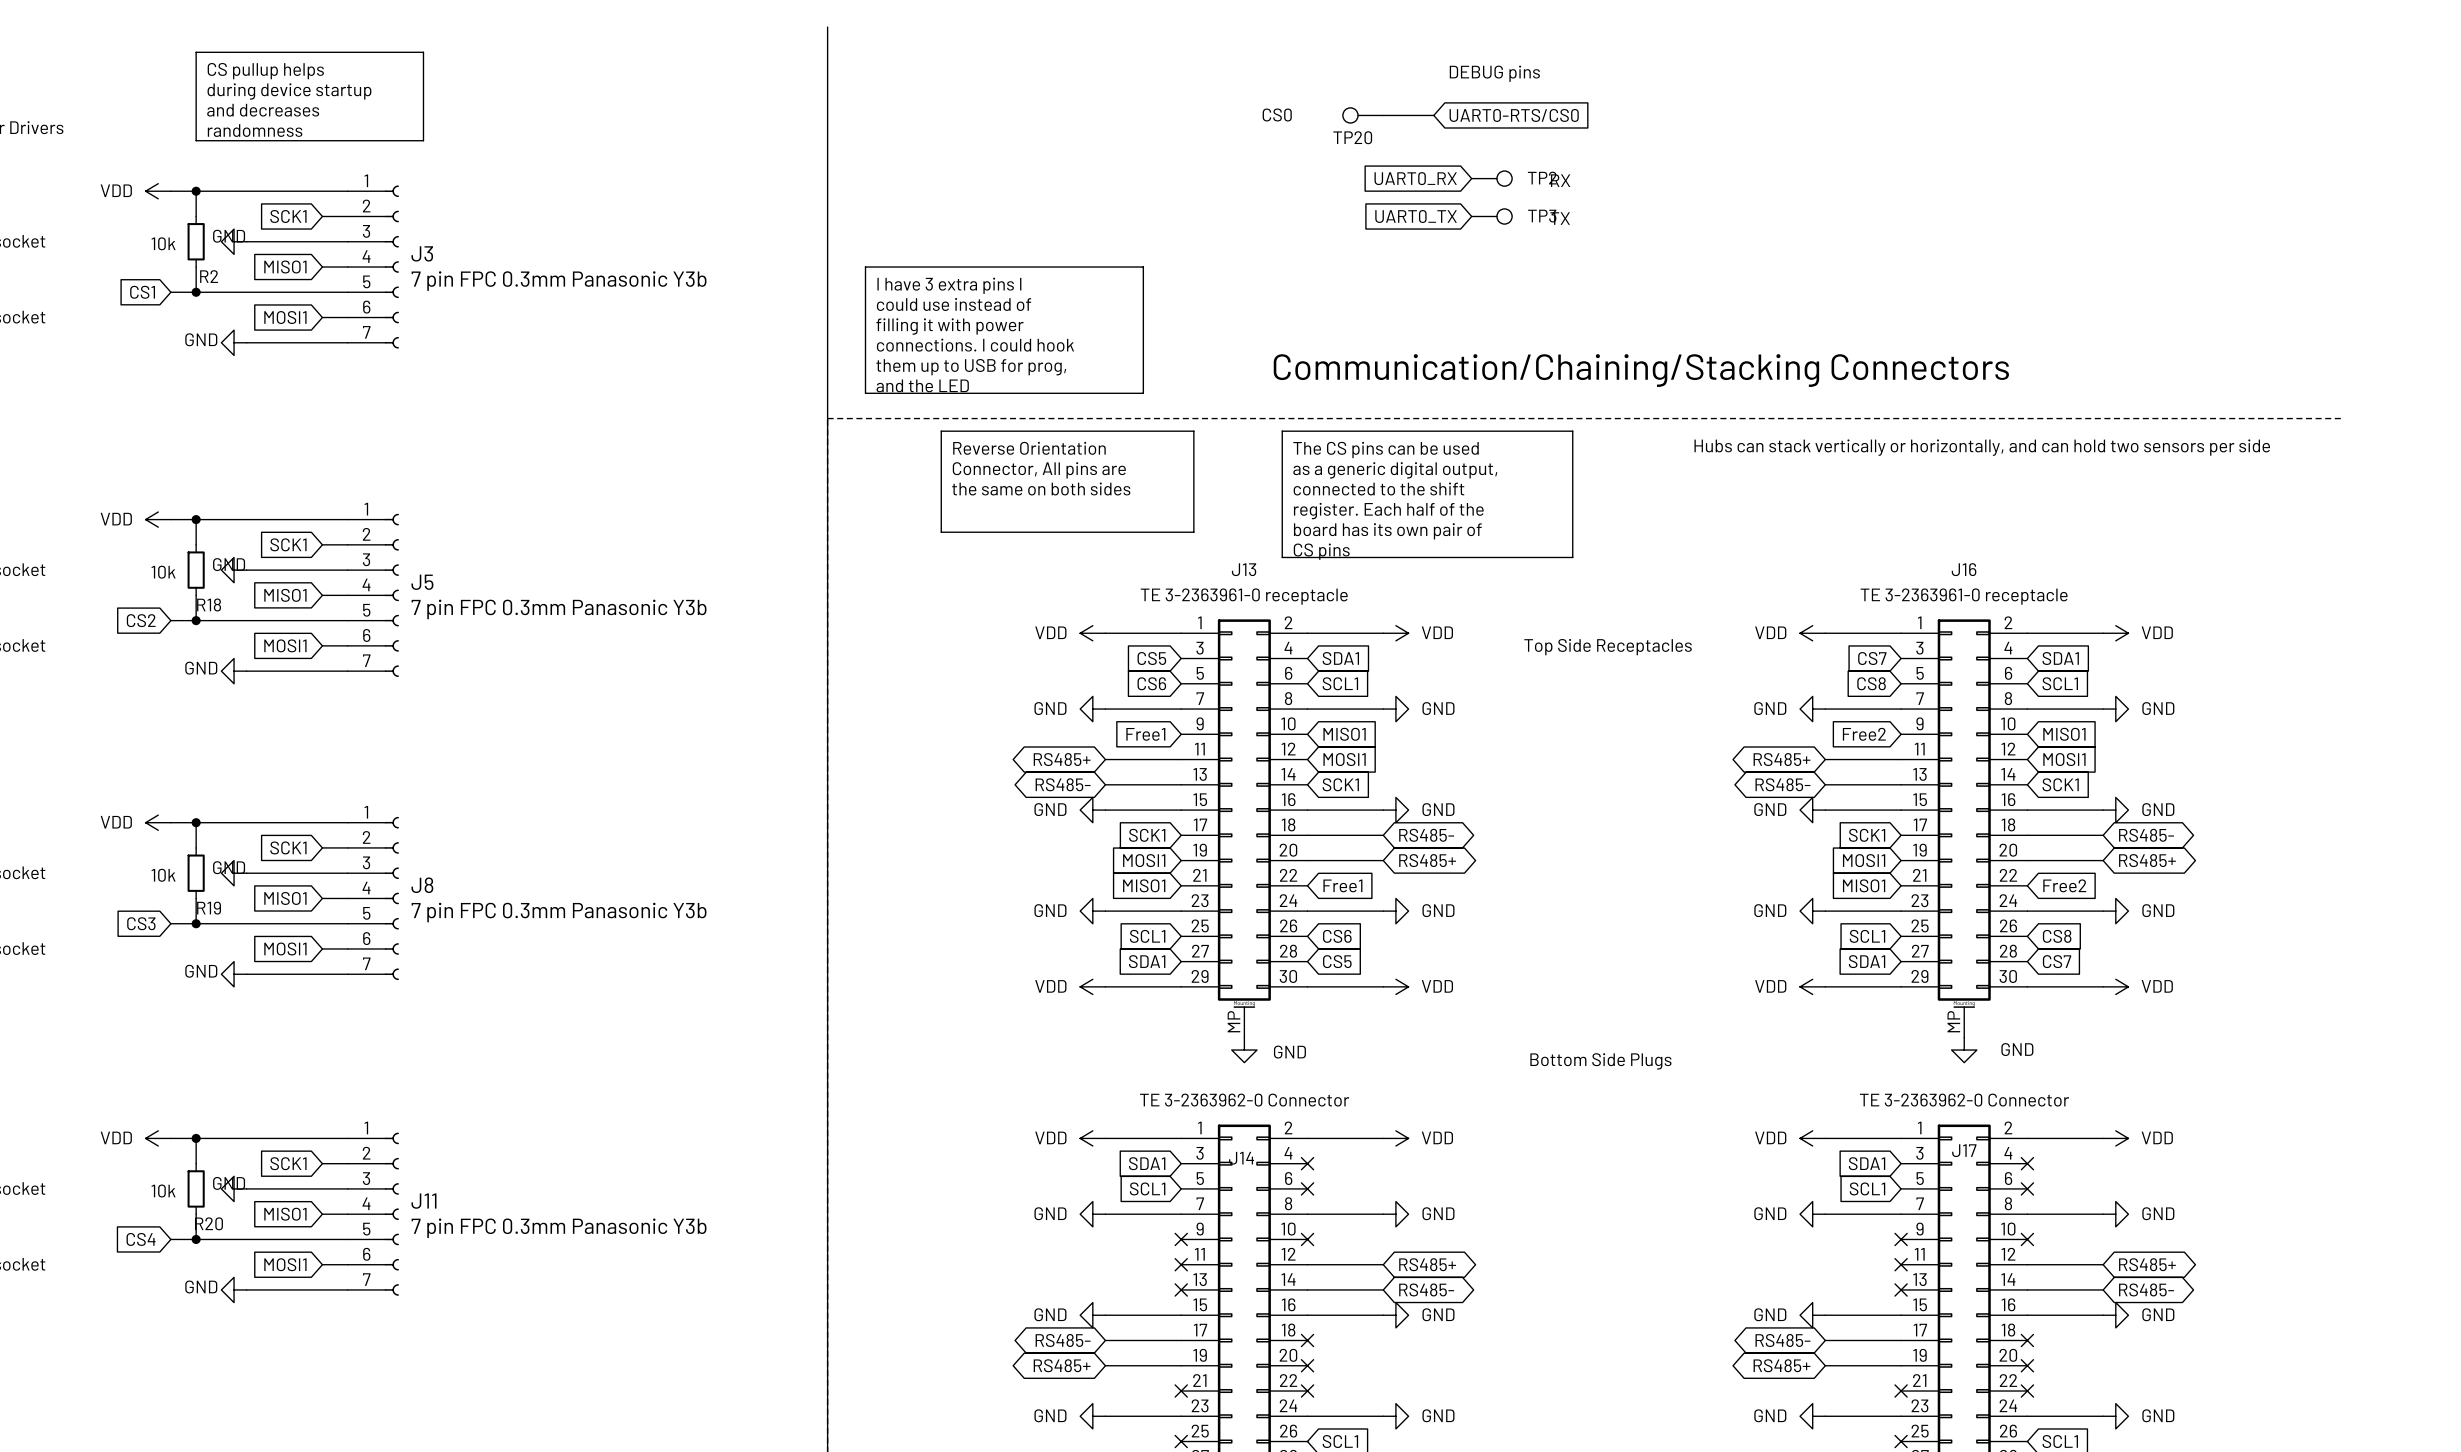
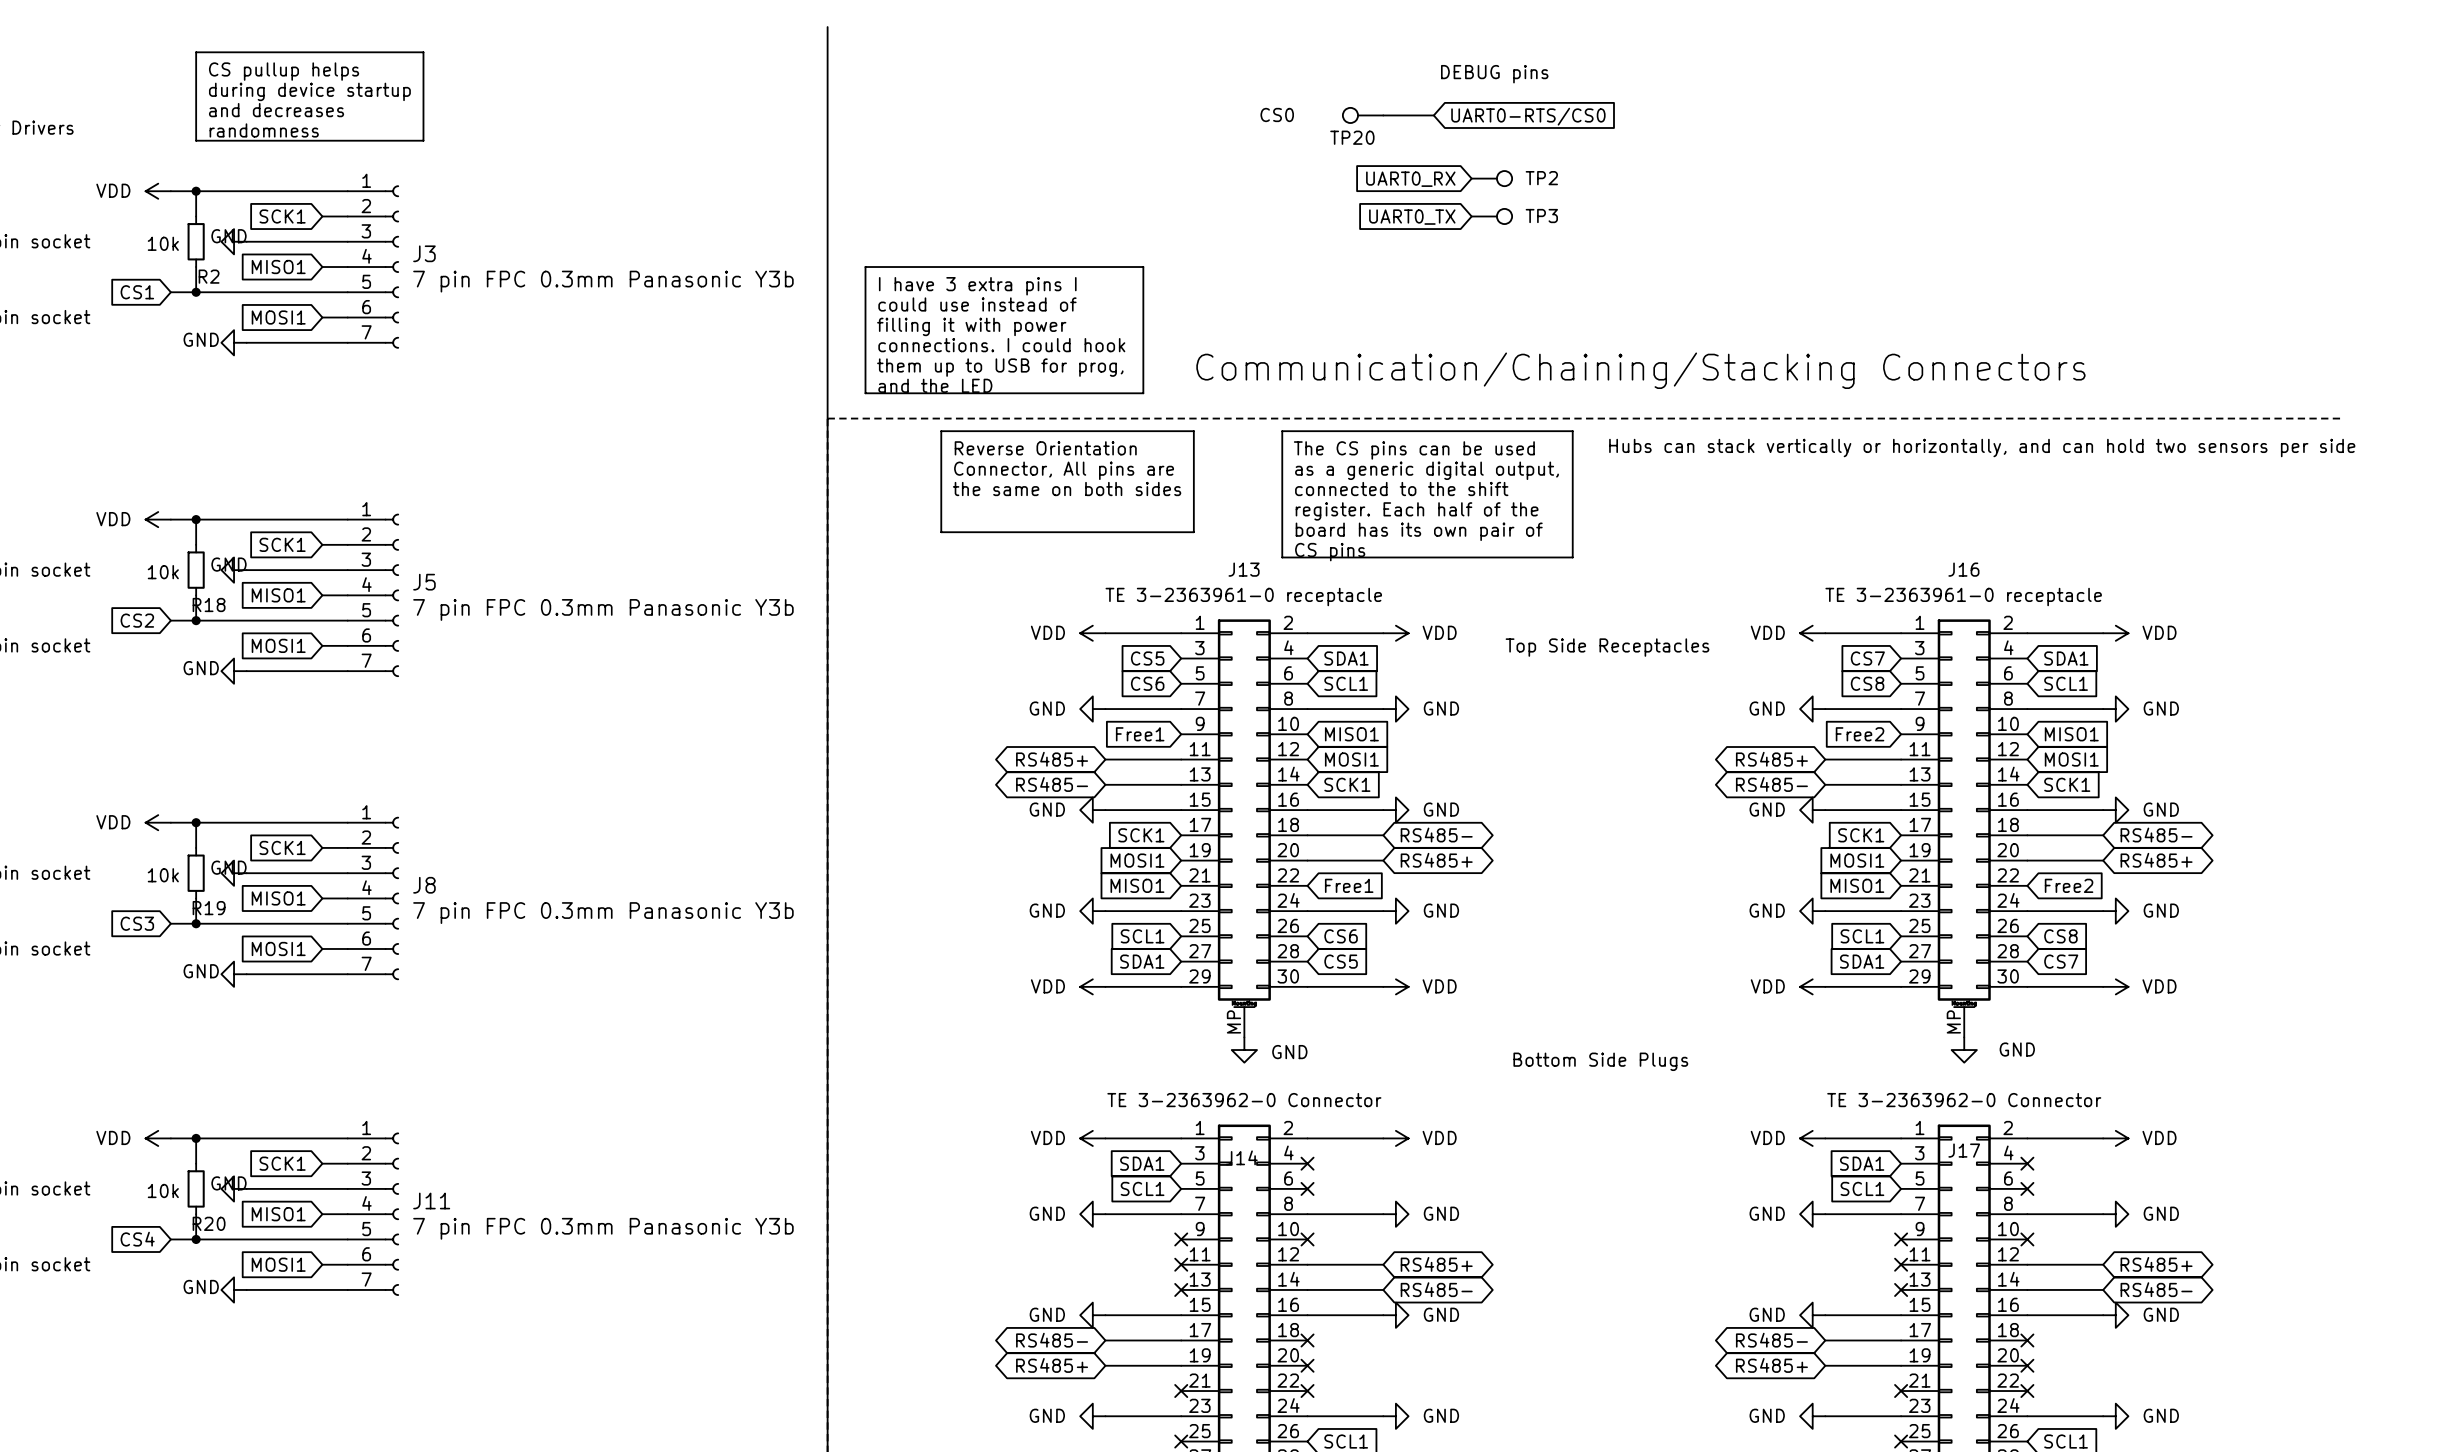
TP2 value: RX (1560, 180) -> none
TP3 value: TX (1560, 218) -> none

